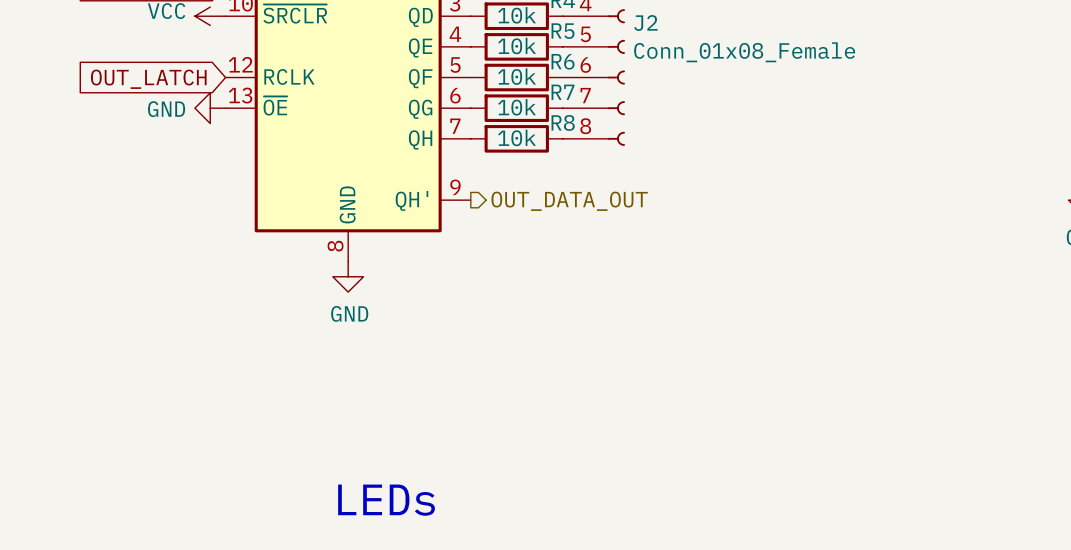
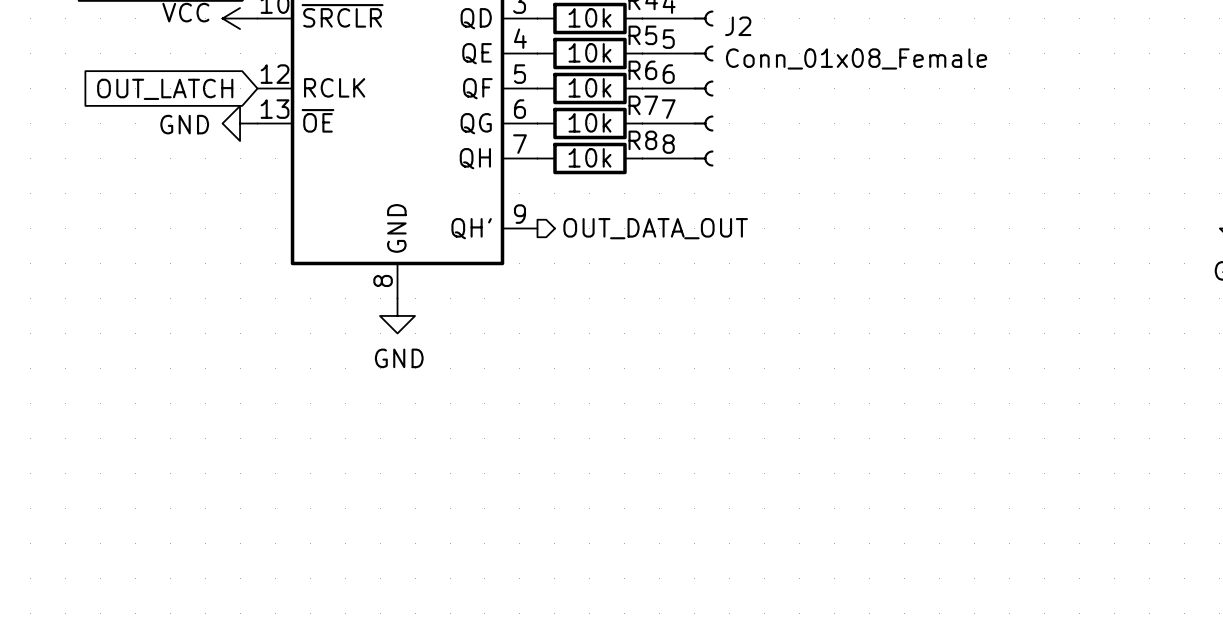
text: LEDs (386, 500) -> none

